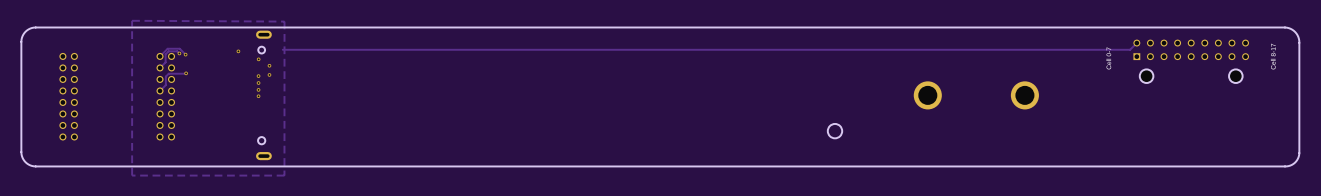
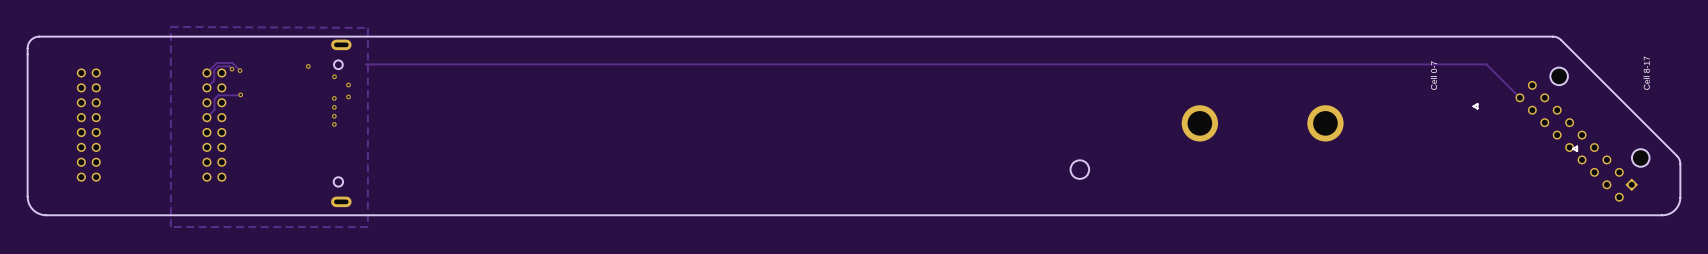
board edge: (21, 41) (25, 31) (35, 27) (1284, 27) (1295, 32) (1299, 40) (1299, 126) -> (27, 54) (29, 42) (39, 36) (1554, 36) (1561, 40) (1676, 155) (1680, 164)
track: (1136, 43) (1130, 49) -> (1519, 97) (1486, 64) (1461, 64)
part: (1191, 61) -> none
drawing: none -> [1473, 103, 1478, 110]
part: none -> (1582, 134)
drawing: none -> [1572, 146, 1578, 152]

